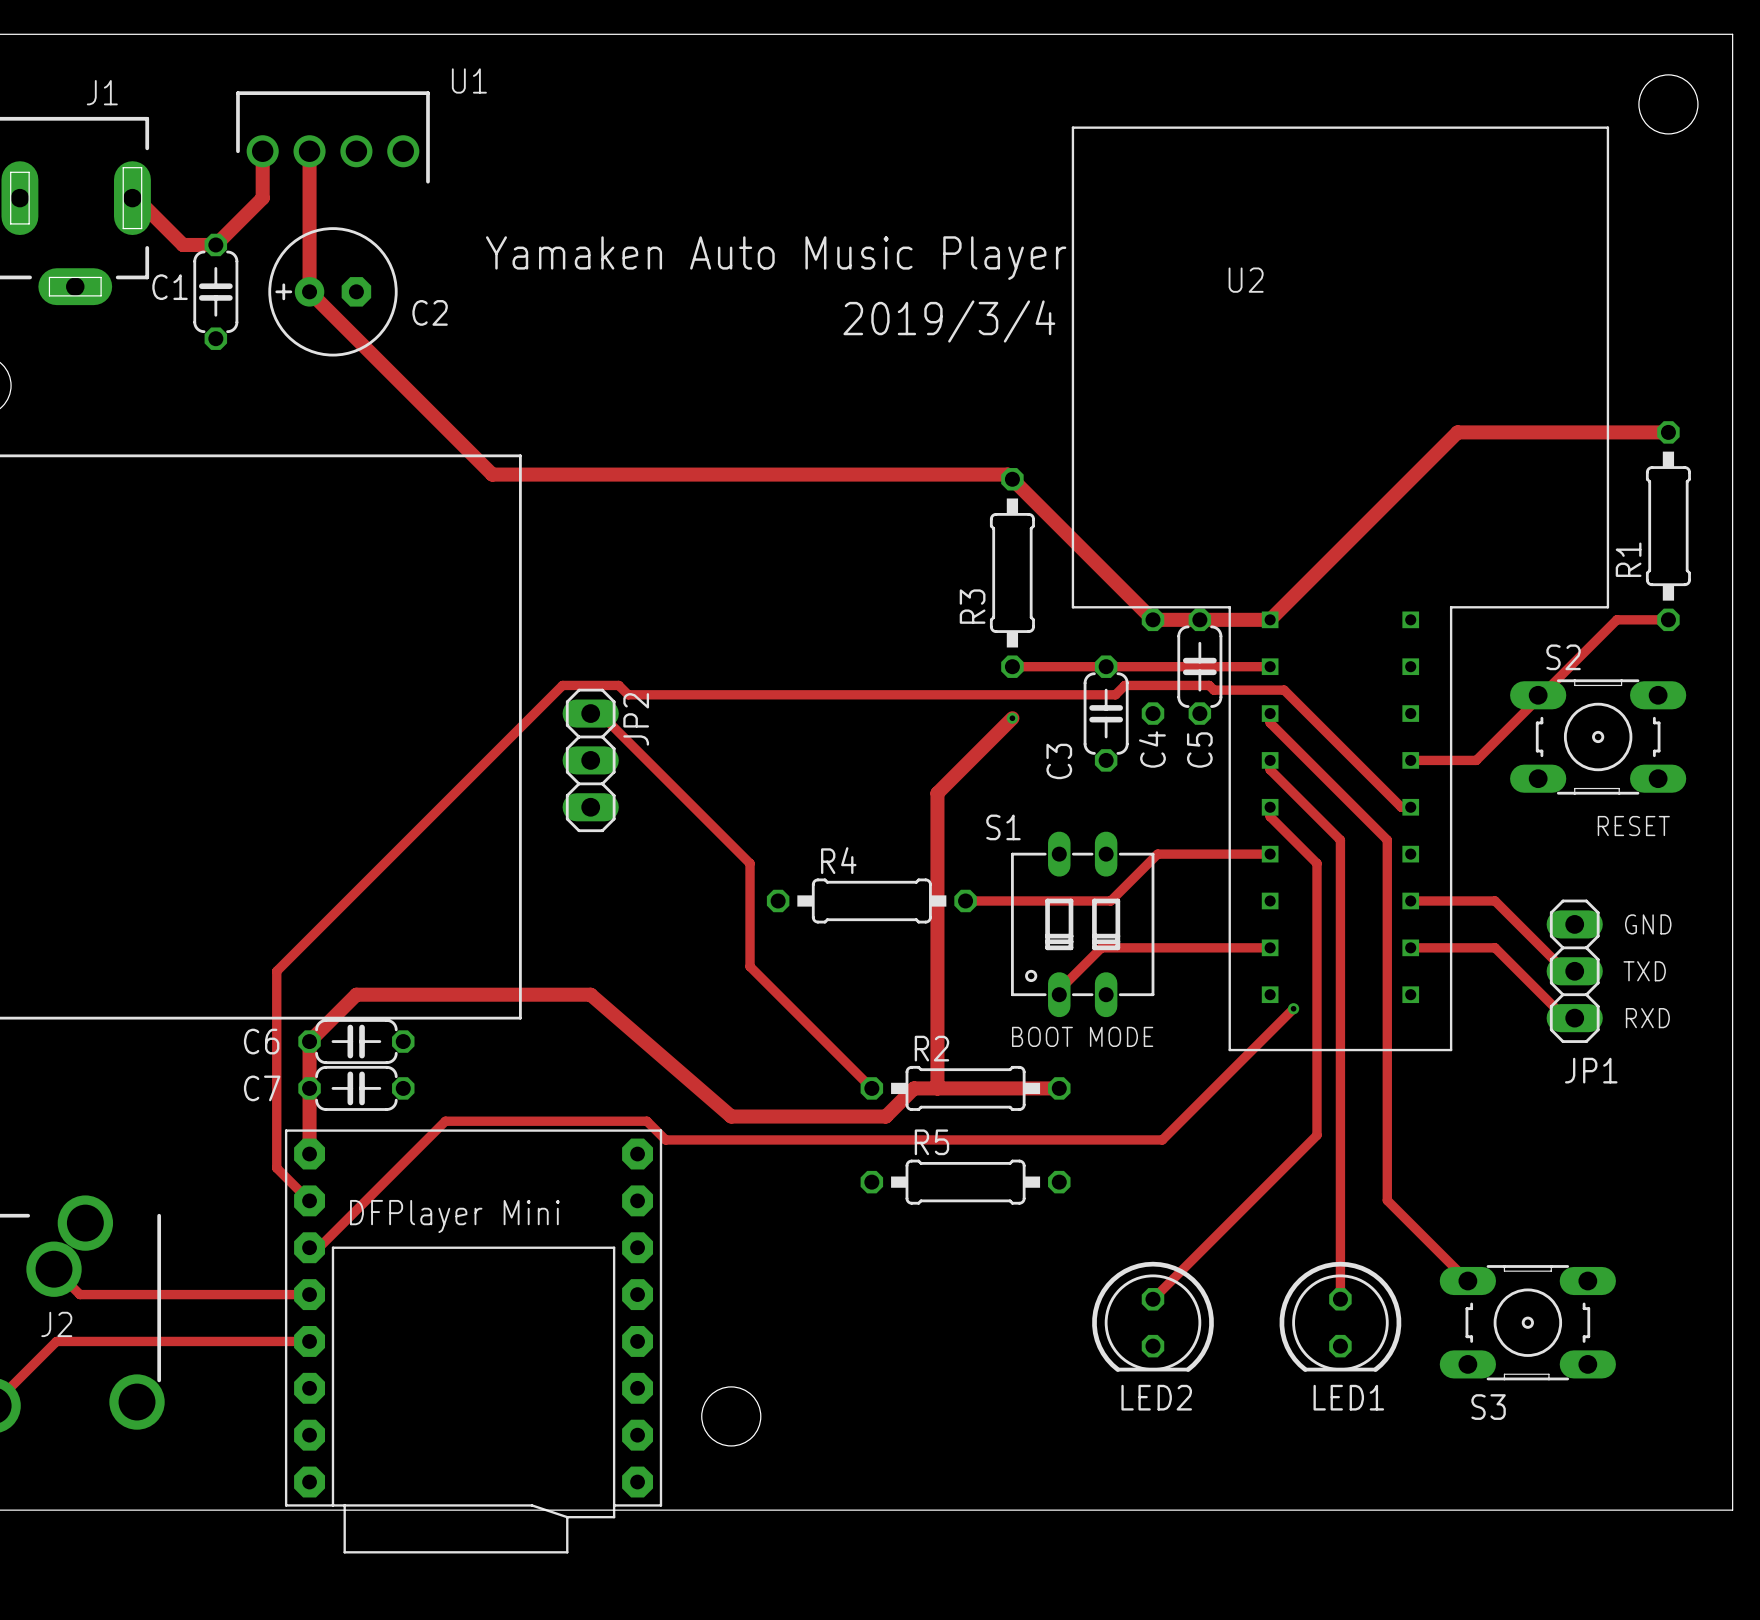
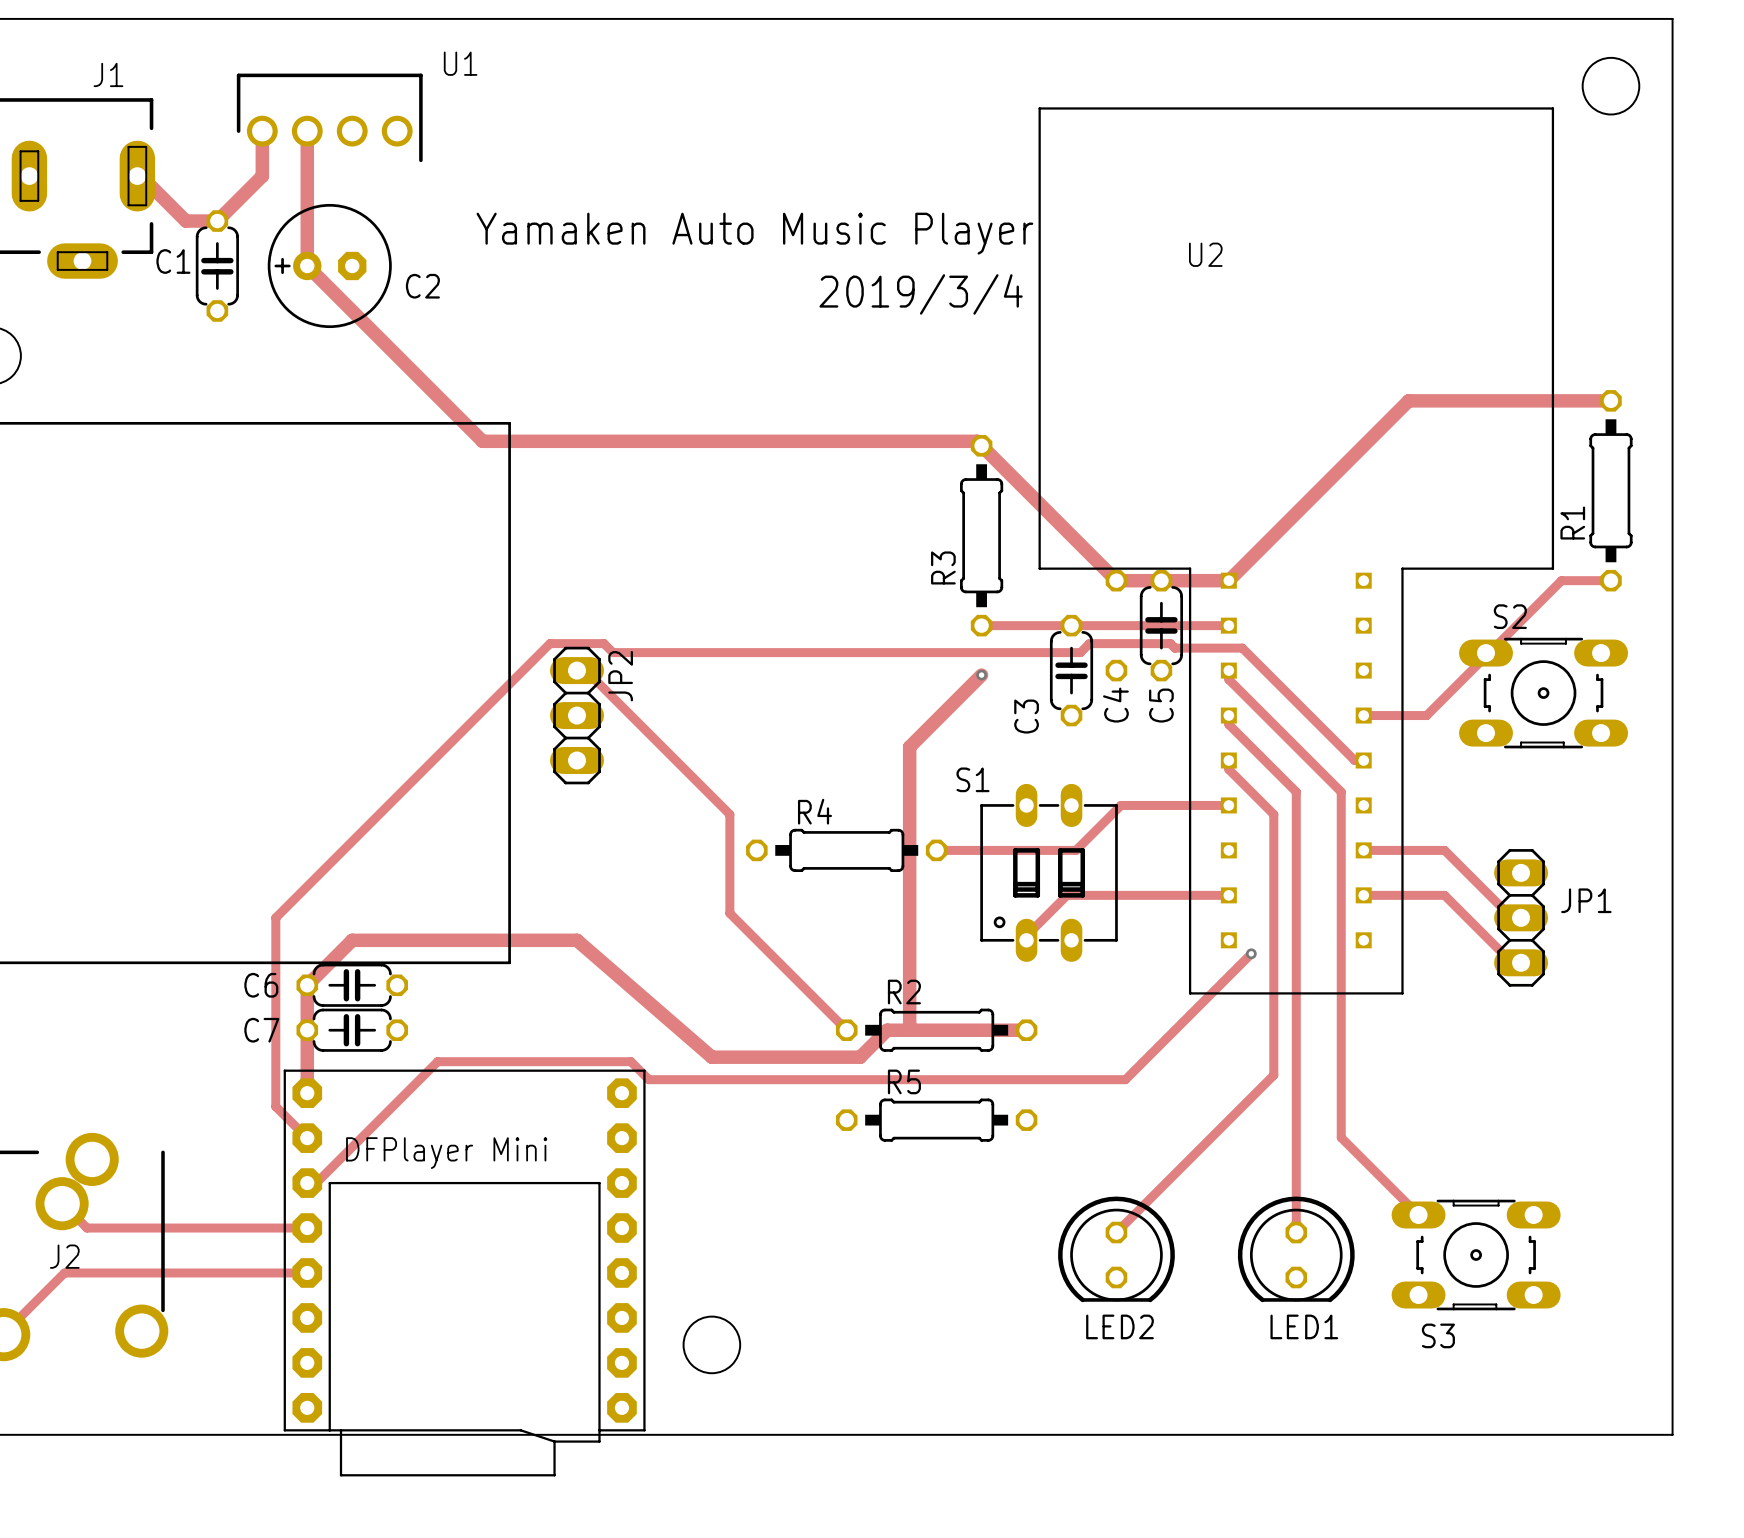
text: RESET (1633, 826) -> none
text: GND (1648, 924) -> none
text: TXD (1644, 971) -> none
text: RXD (1647, 1018) -> none
text: BOOT MODE (1082, 1036) -> none
JP1 name position: JP1 (1591, 1070) -> JP1 (1586, 900)

